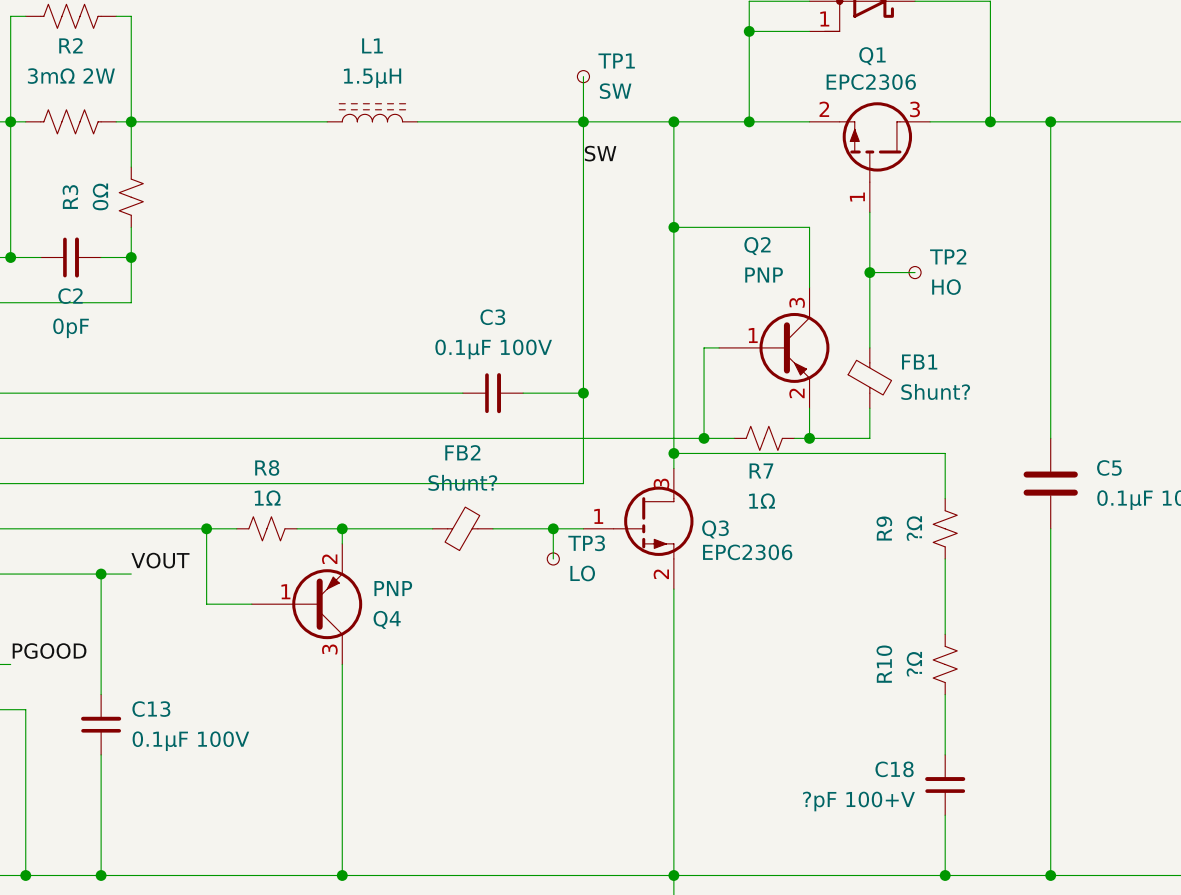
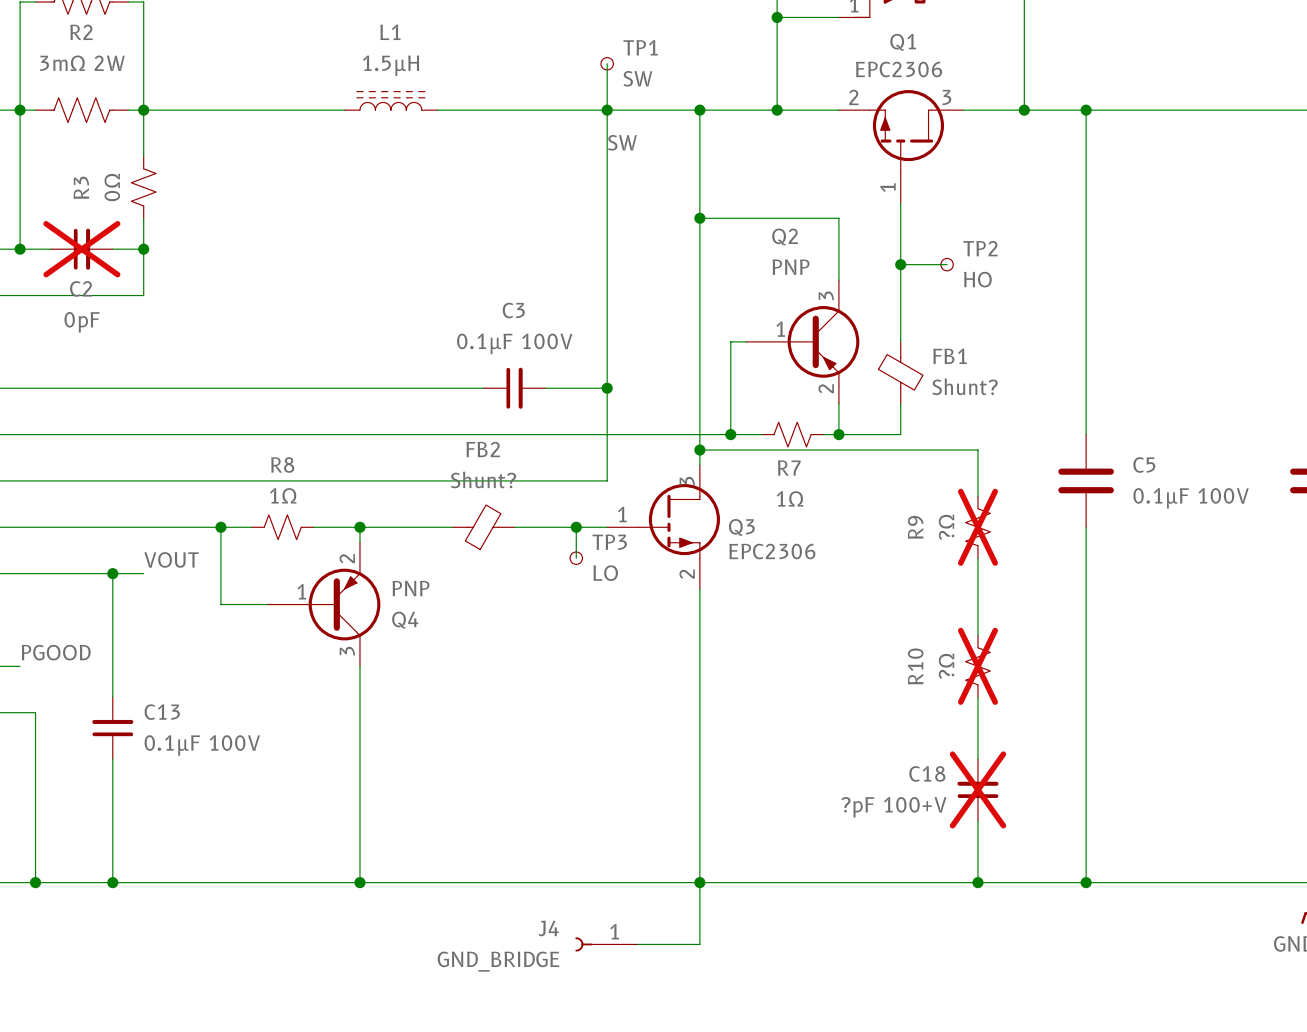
C2 do-not-place cross: none -> (81, 249)
R9 do-not-place cross: none -> (977, 527)
R10 do-not-place cross: none -> (977, 666)
C18 do-not-place cross: none -> (977, 789)

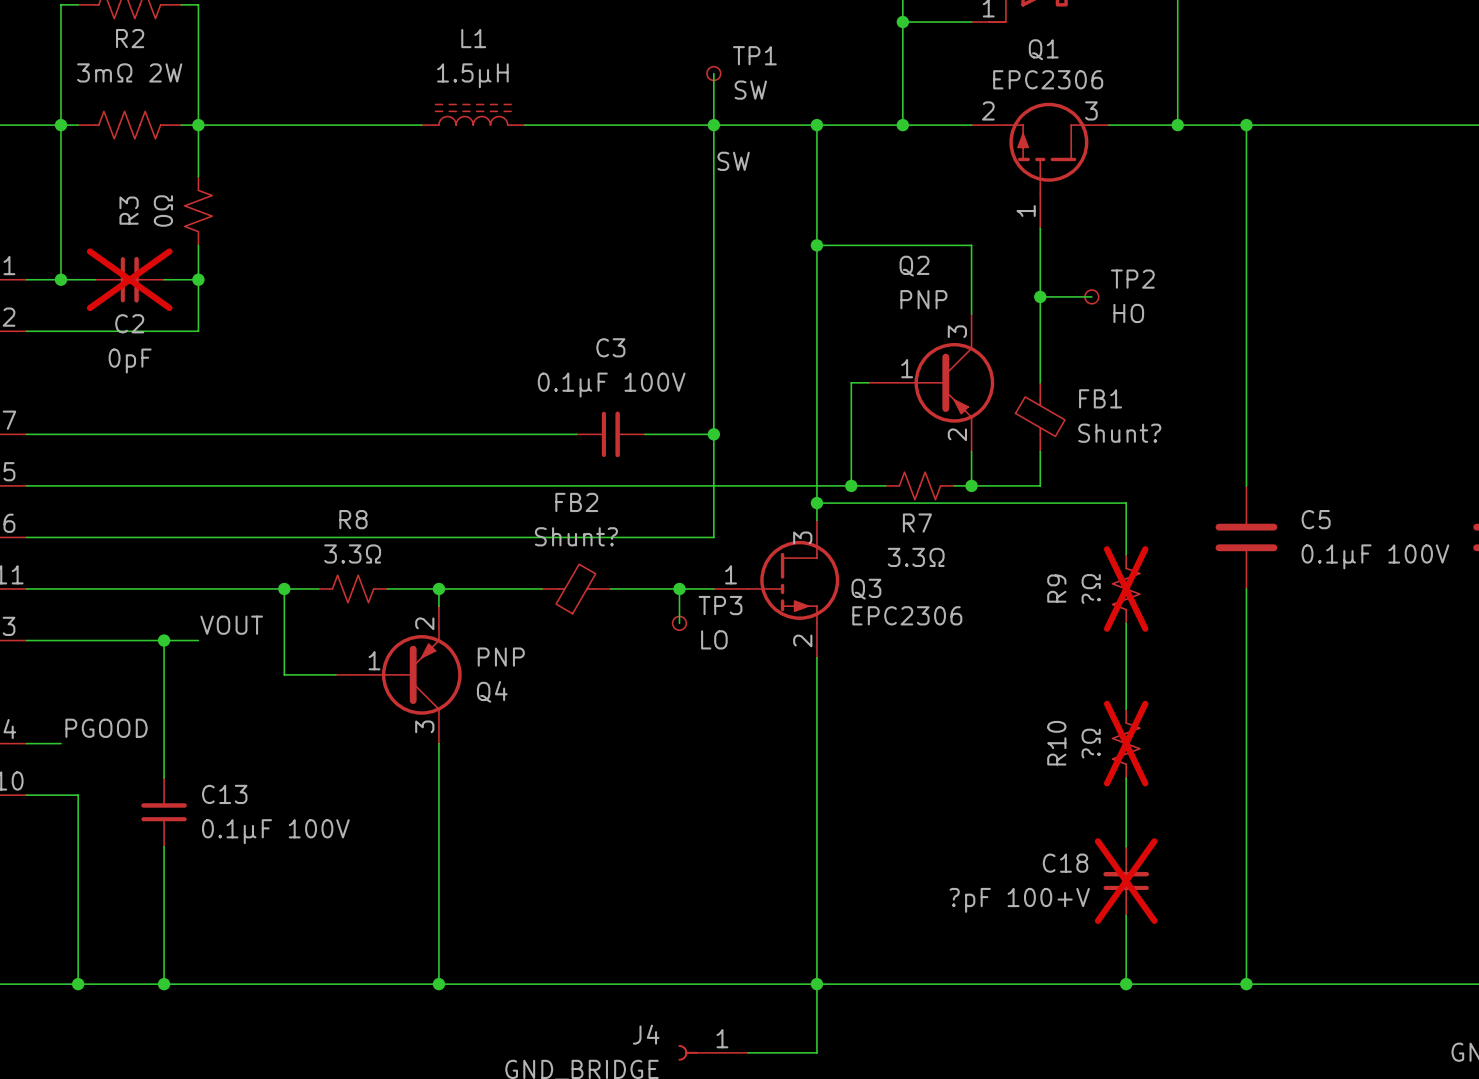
R8 value: 1Ω (283, 495) -> 3.3Ω (352, 553)
R7 value: 1Ω (789, 498) -> 3.3Ω (916, 557)

